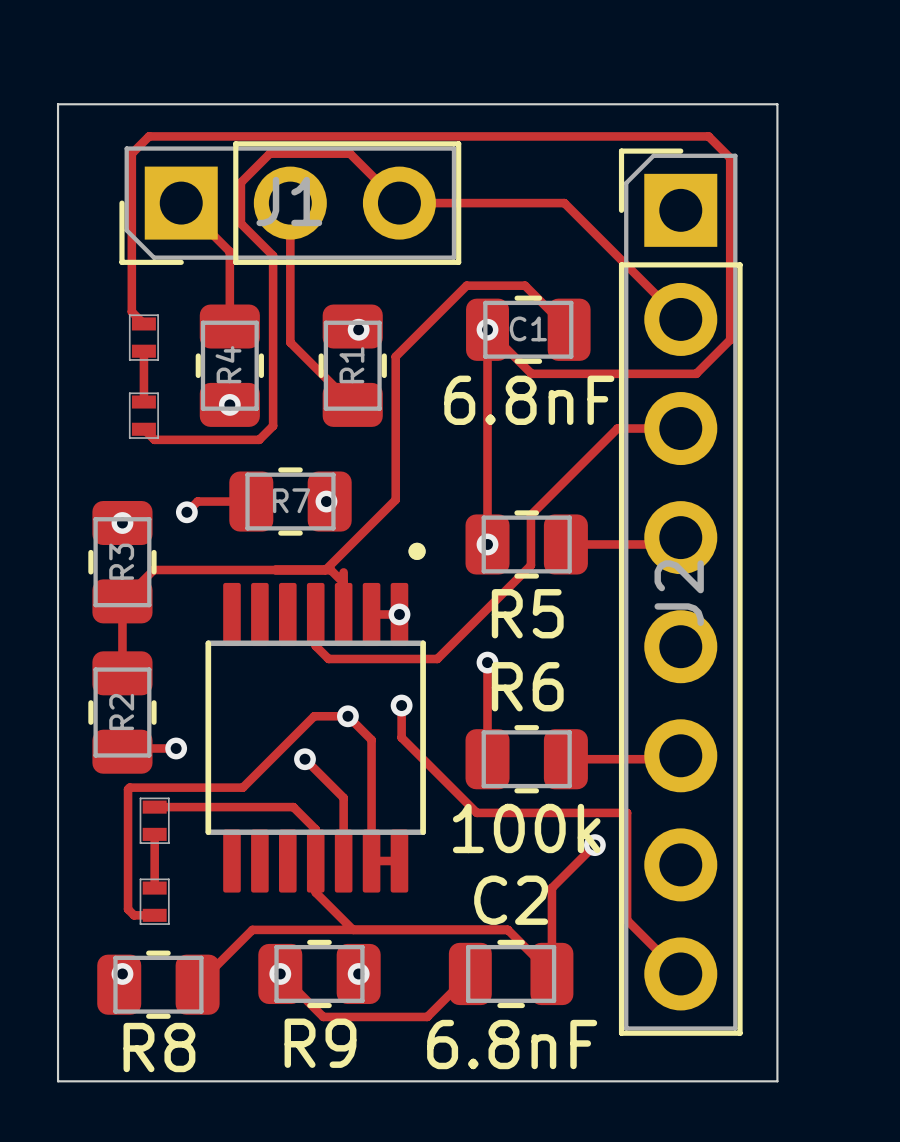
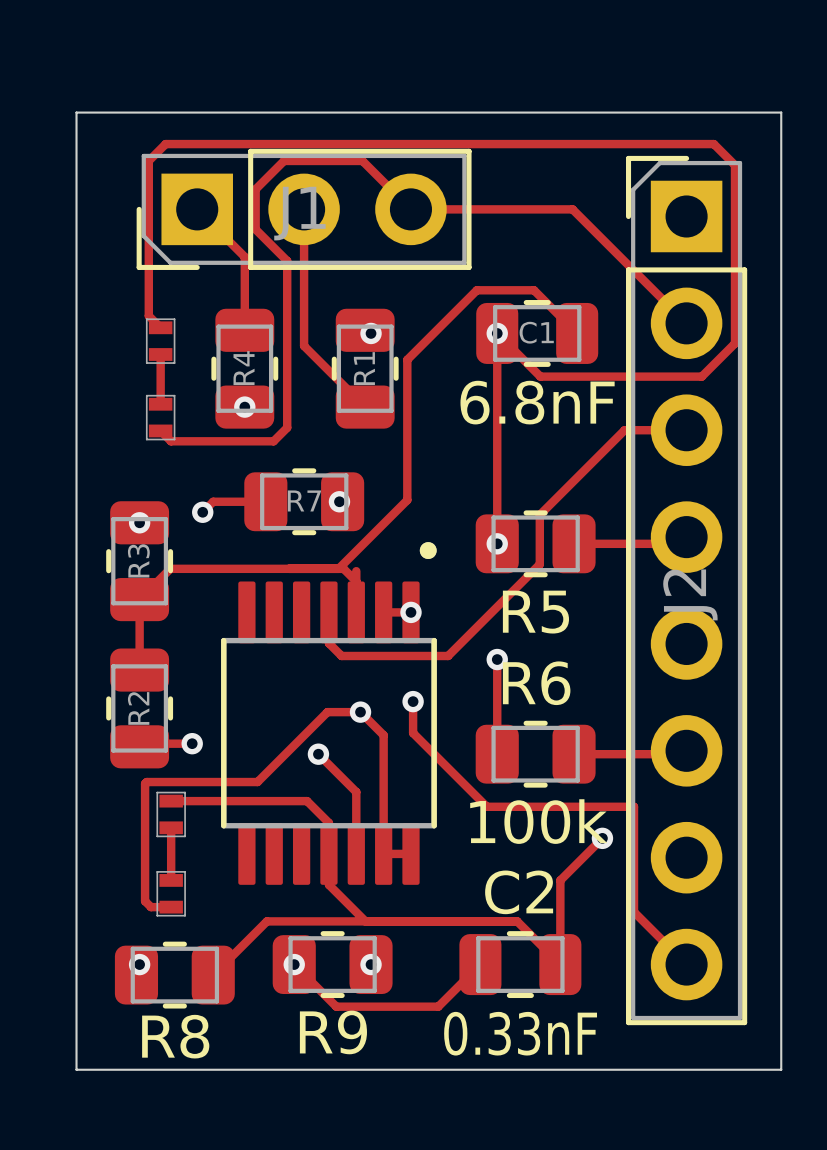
C2 value: 6.8nF (512, 1044) -> 0.33nF (520, 1033)

